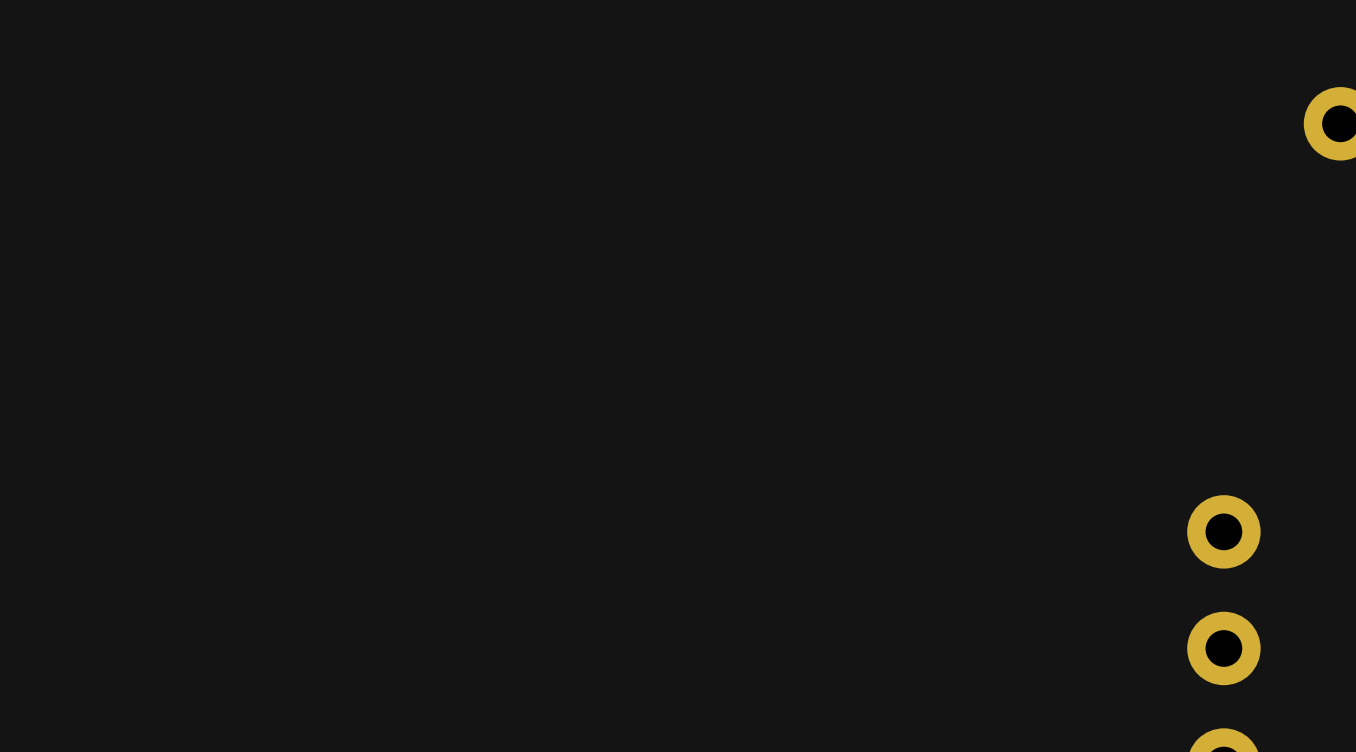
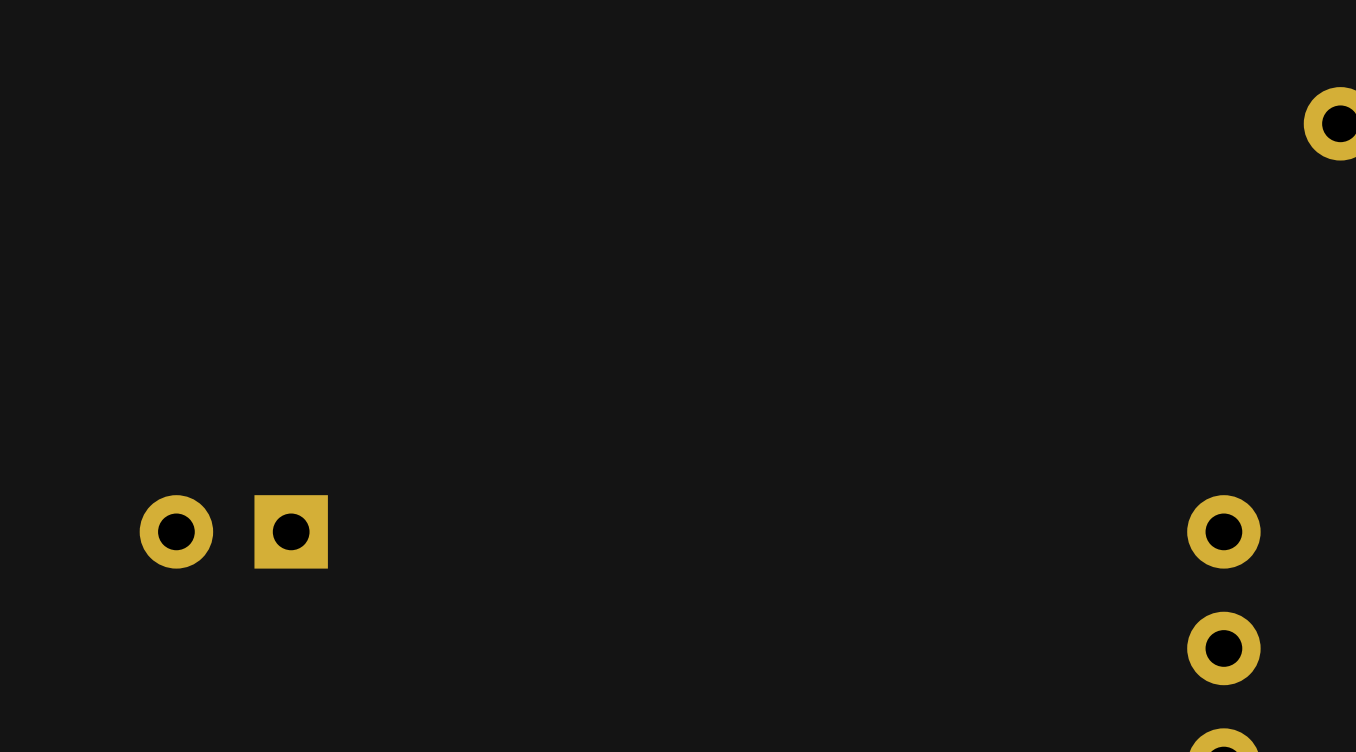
part: none -> (233, 531)

